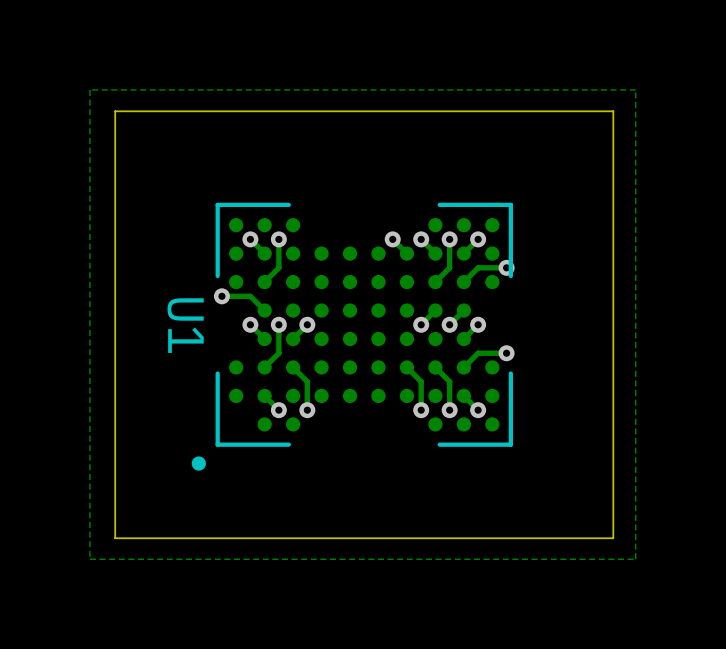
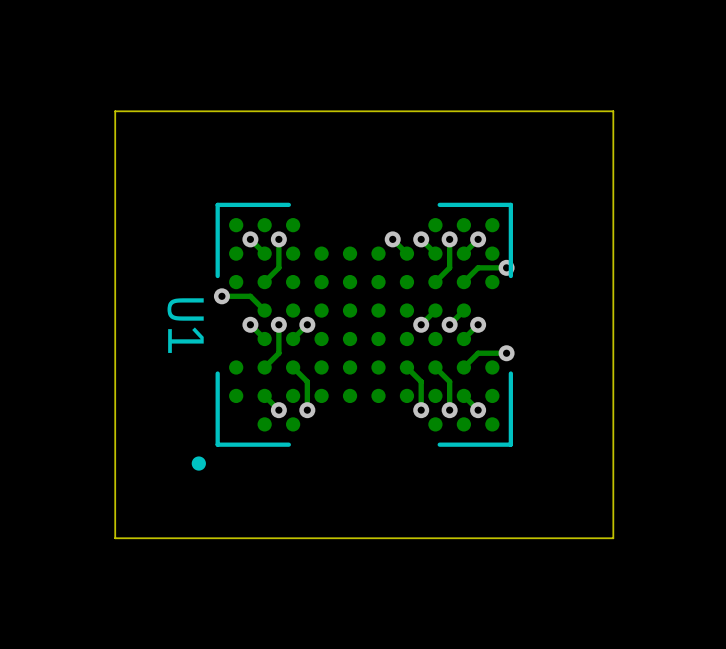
zone outline: (635, 89) (89, 89) (89, 559) (635, 559) (635, 89) -> none

